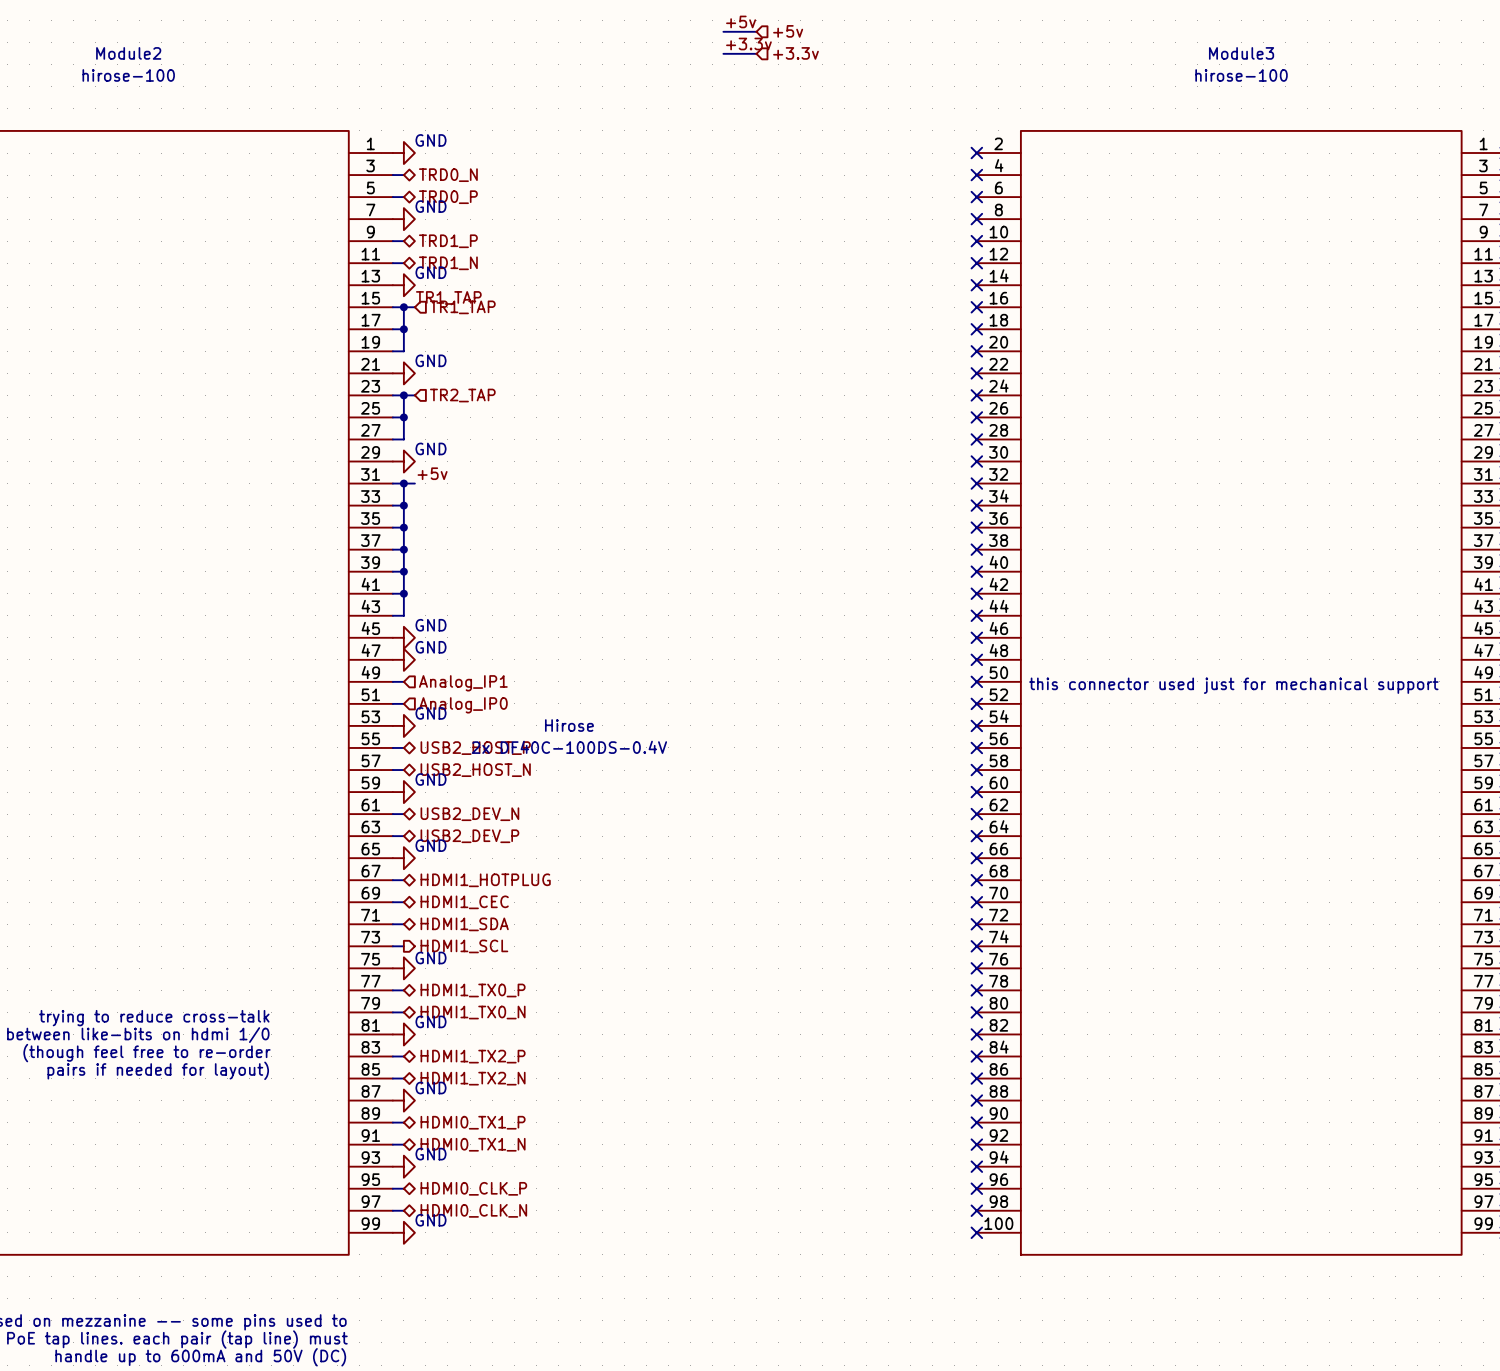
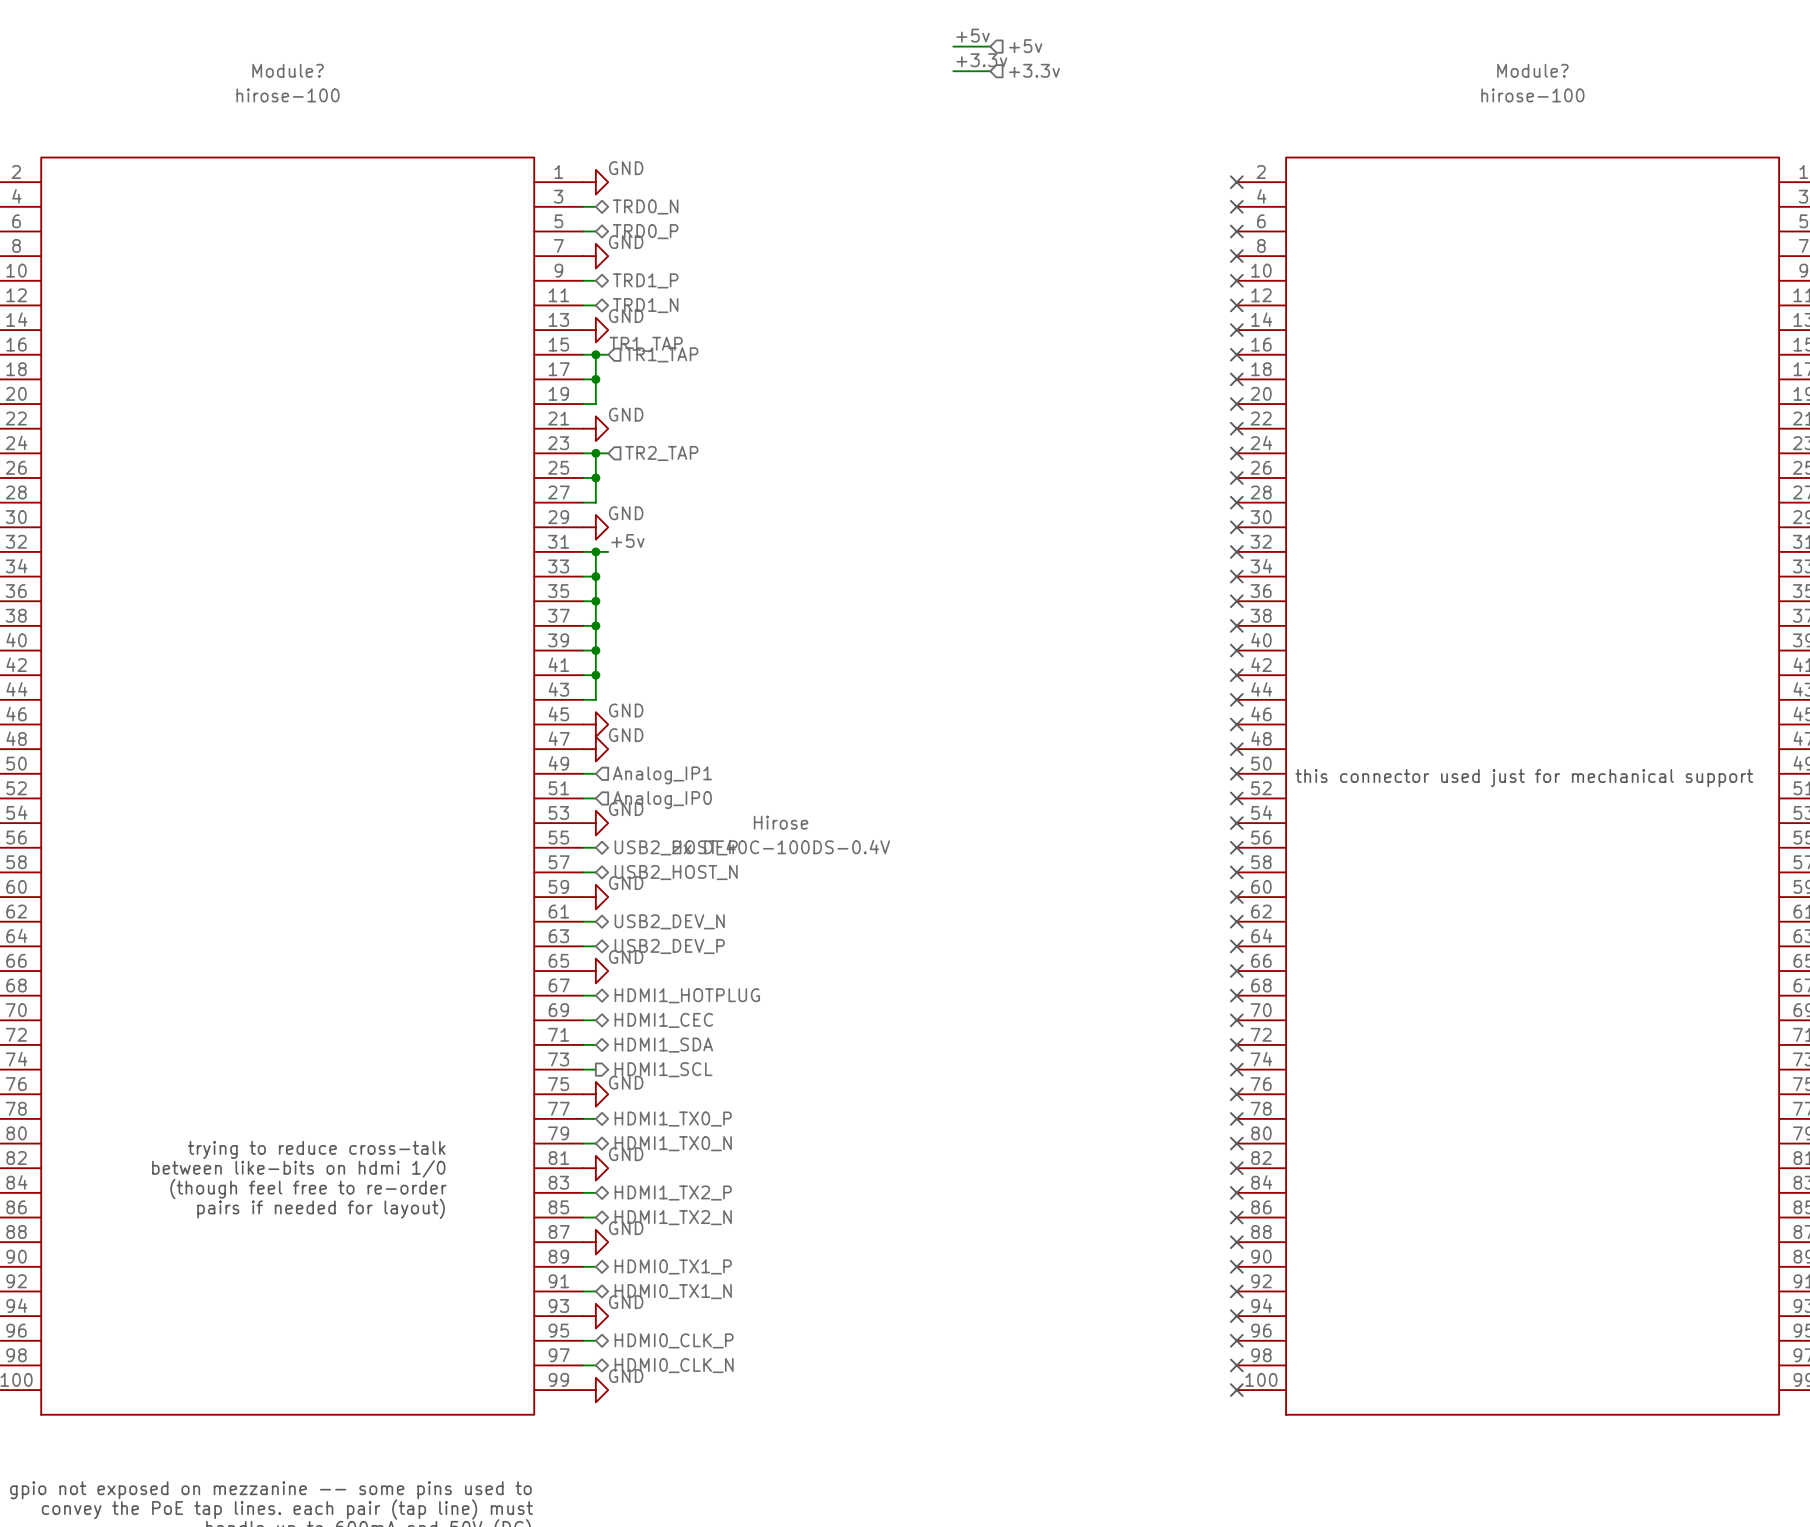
Module2 name: Module2 (128, 53) -> Module? (288, 70)
Module3 name: Module3 (1241, 53) -> Module? (1532, 70)

